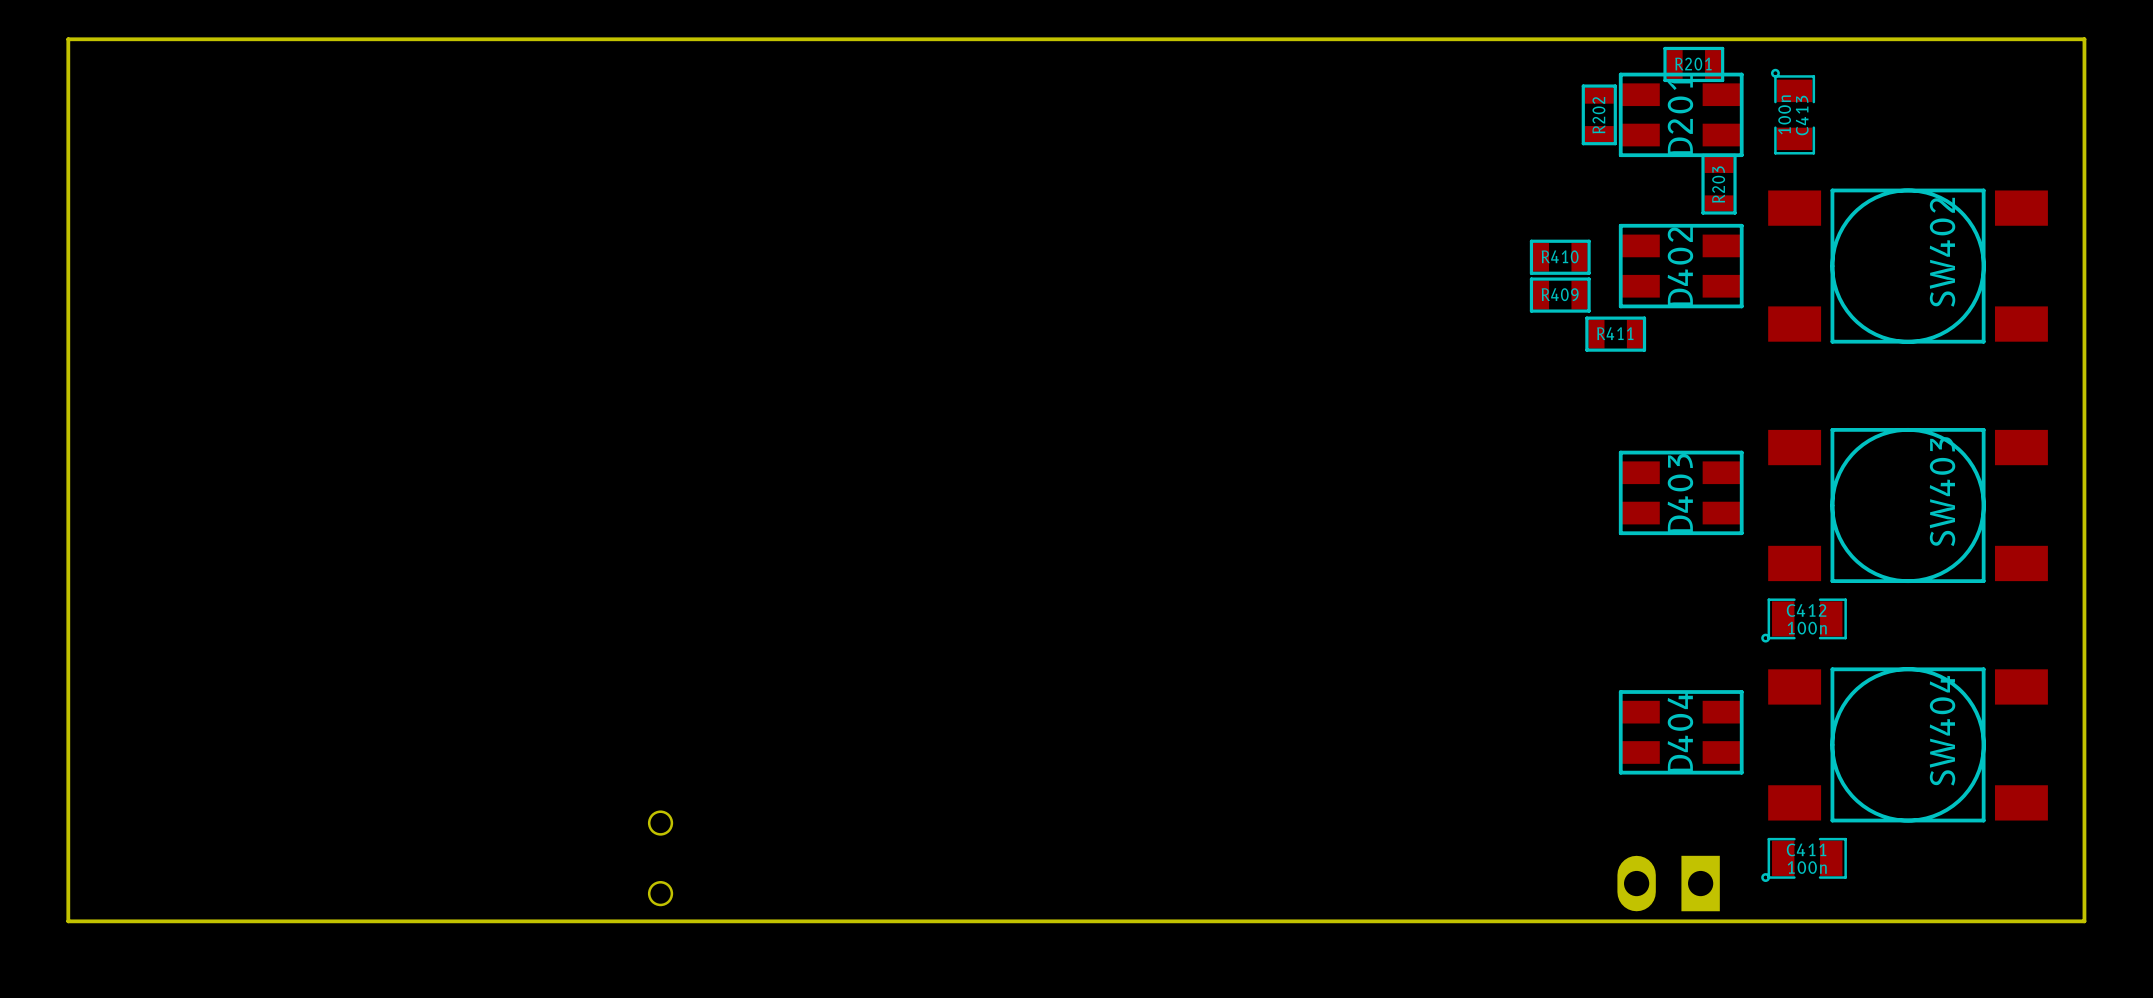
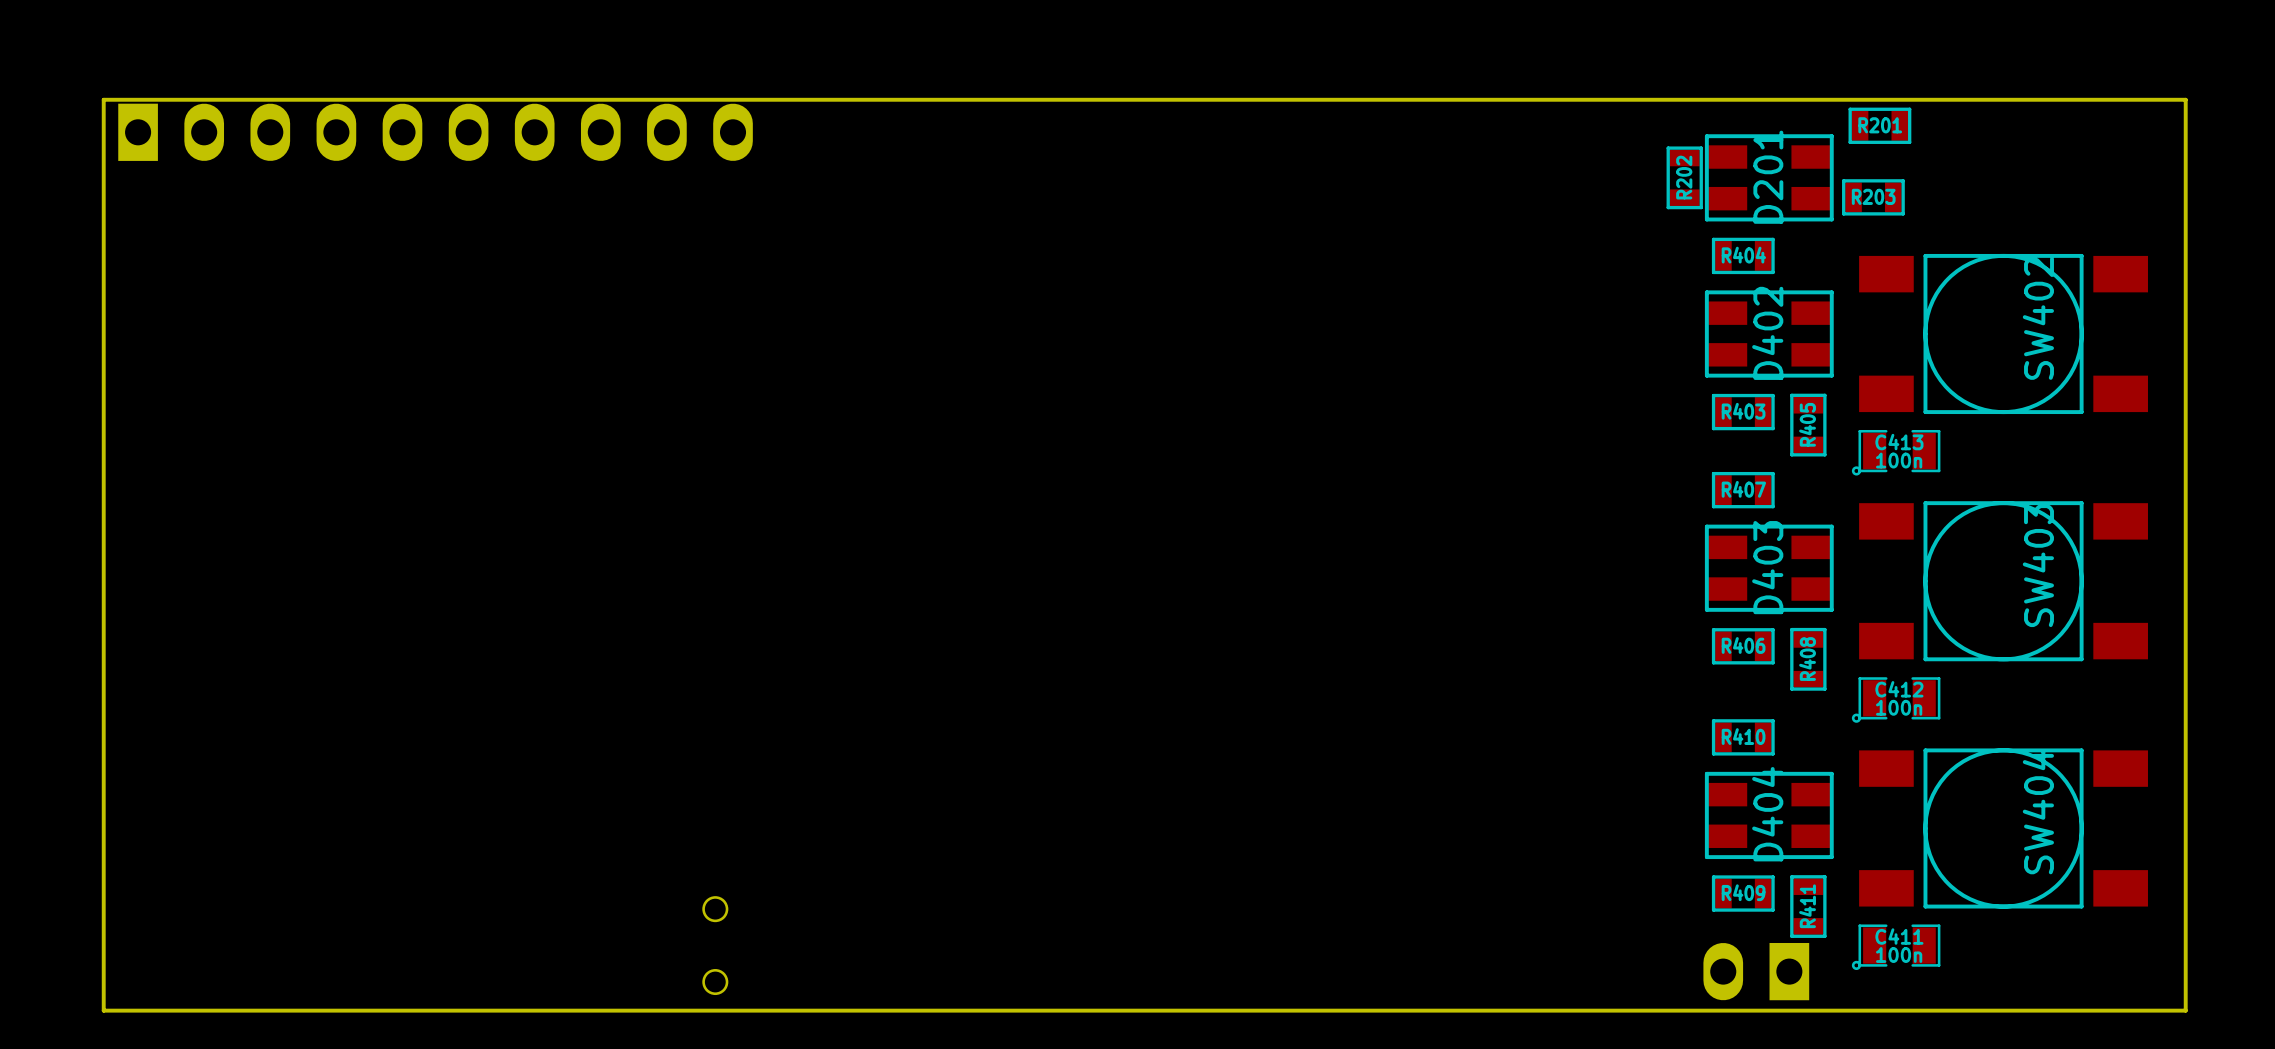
R201 position: (1693, 64) -> (1879, 125)
part: none -> (435, 132)
C413 rotation: 0° (1793, 111) -> 90° counterclockwise (1896, 452)
C413 position: (1793, 111) -> (1896, 452)
R203 rotation: 0° (1719, 184) -> 90° clockwise (1873, 197)
R203 position: (1719, 184) -> (1873, 197)
R404: none -> (1743, 255)
R410 position: (1560, 257) -> (1743, 737)
R409 position: (1560, 295) -> (1743, 893)
R411 rotation: 0° (1615, 334) -> 90° clockwise (1808, 906)
R411 position: (1615, 334) -> (1808, 906)
R403: none -> (1743, 412)
R405: none -> (1808, 425)
R407: none -> (1743, 490)
R406: none -> (1743, 646)
R408: none -> (1808, 659)

